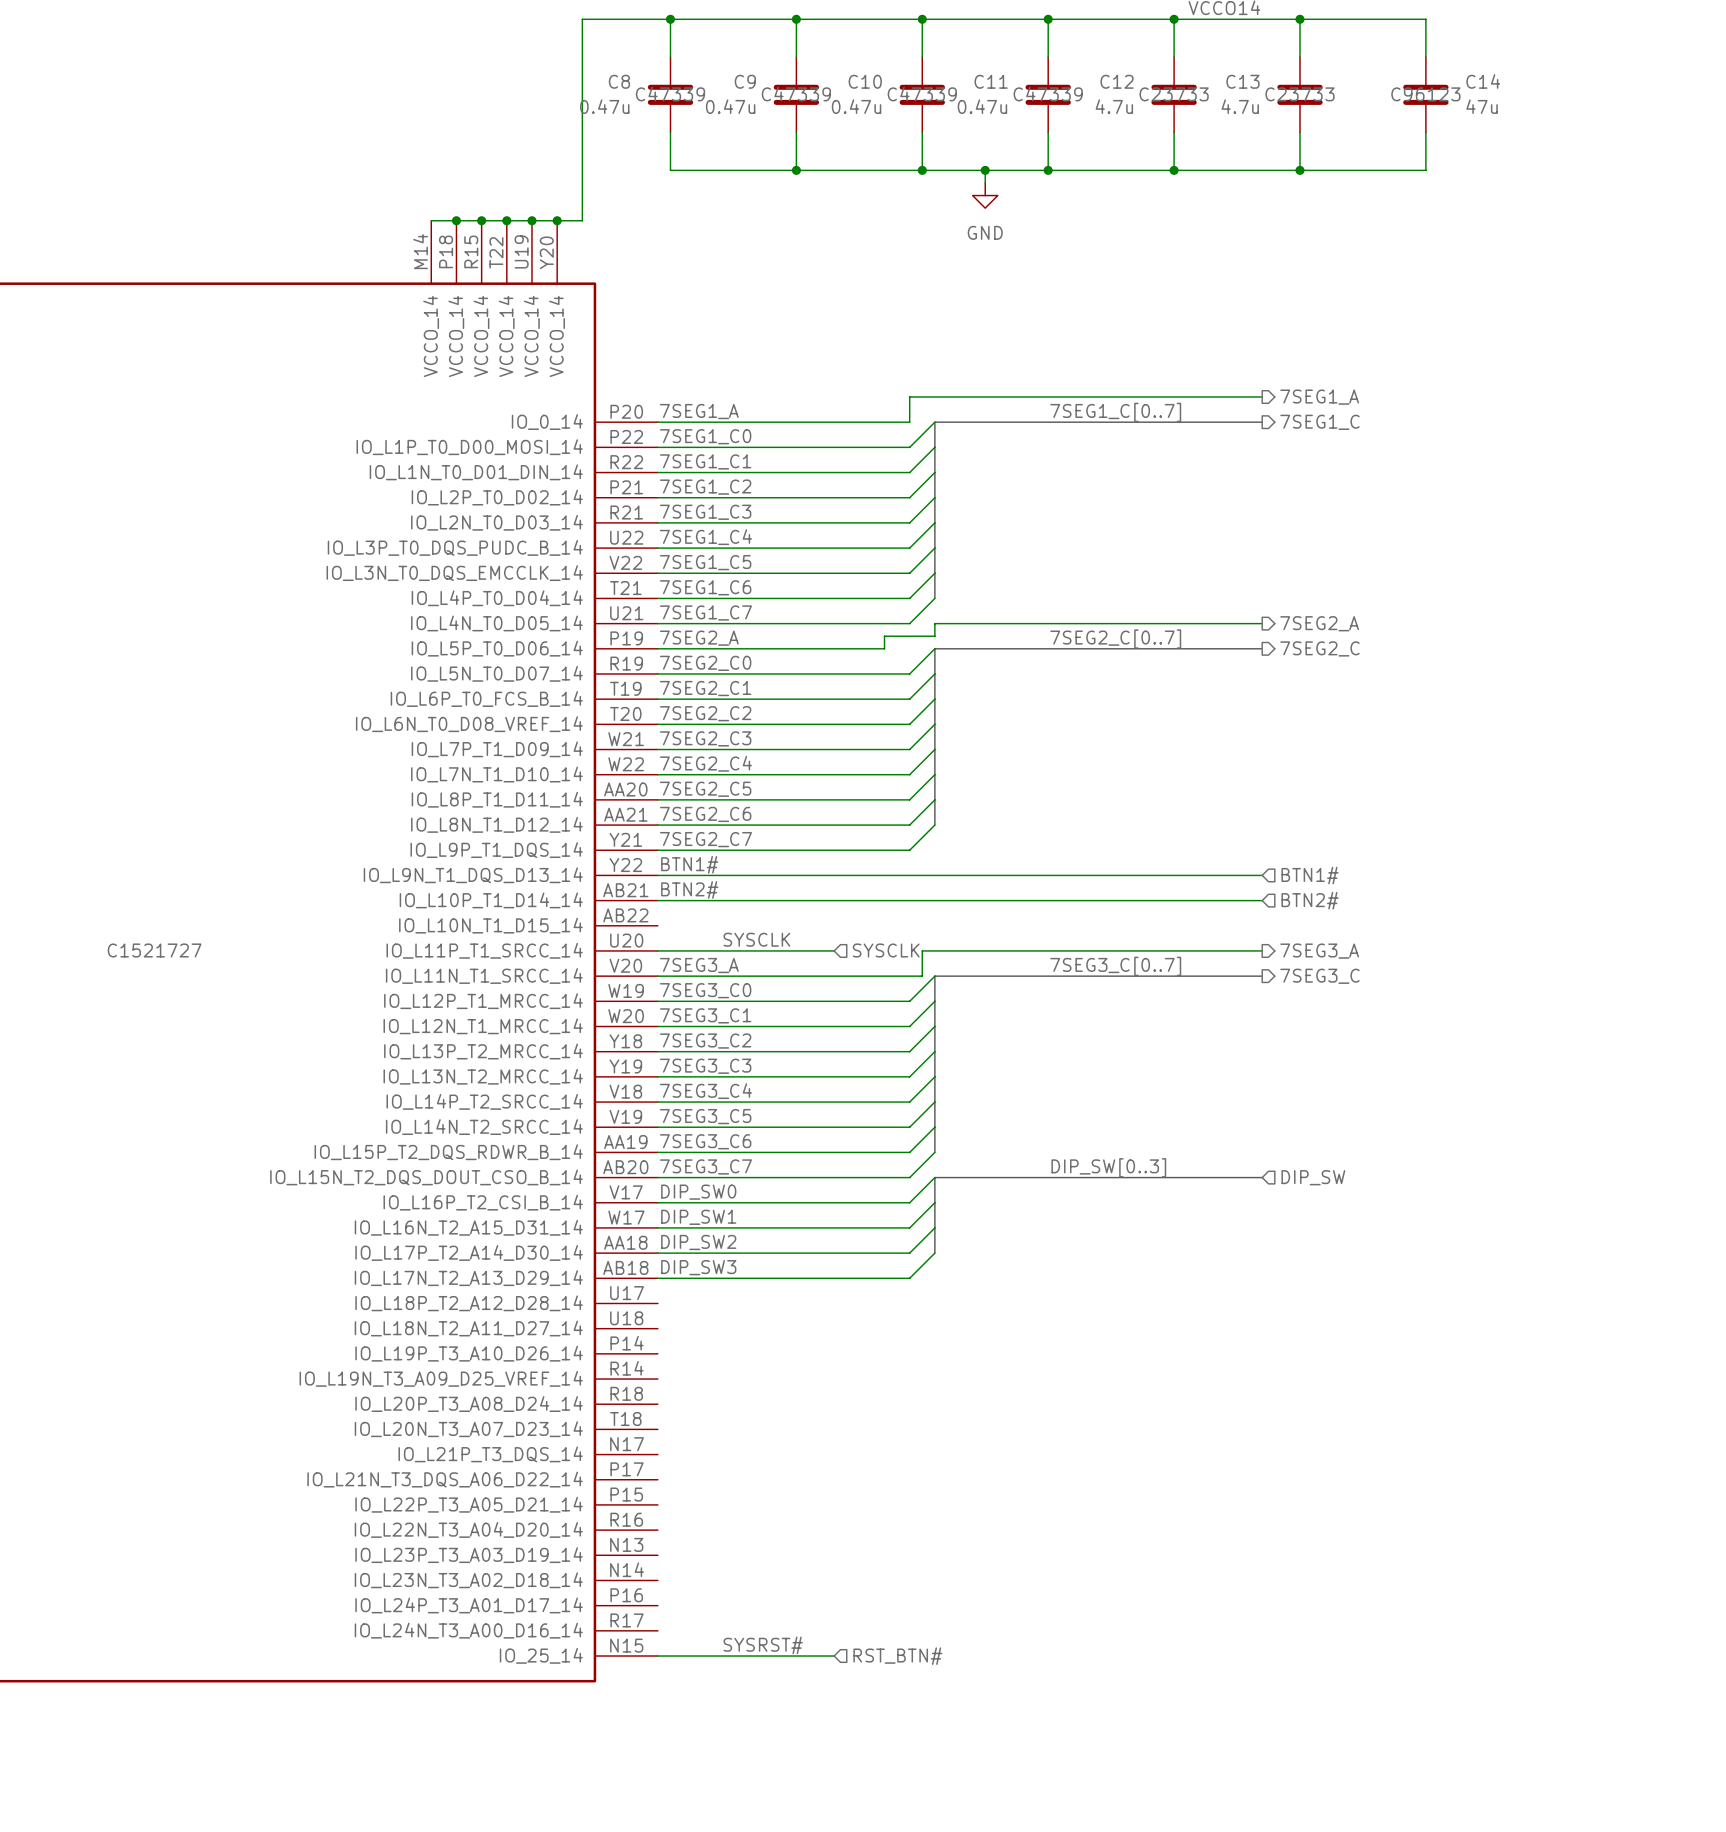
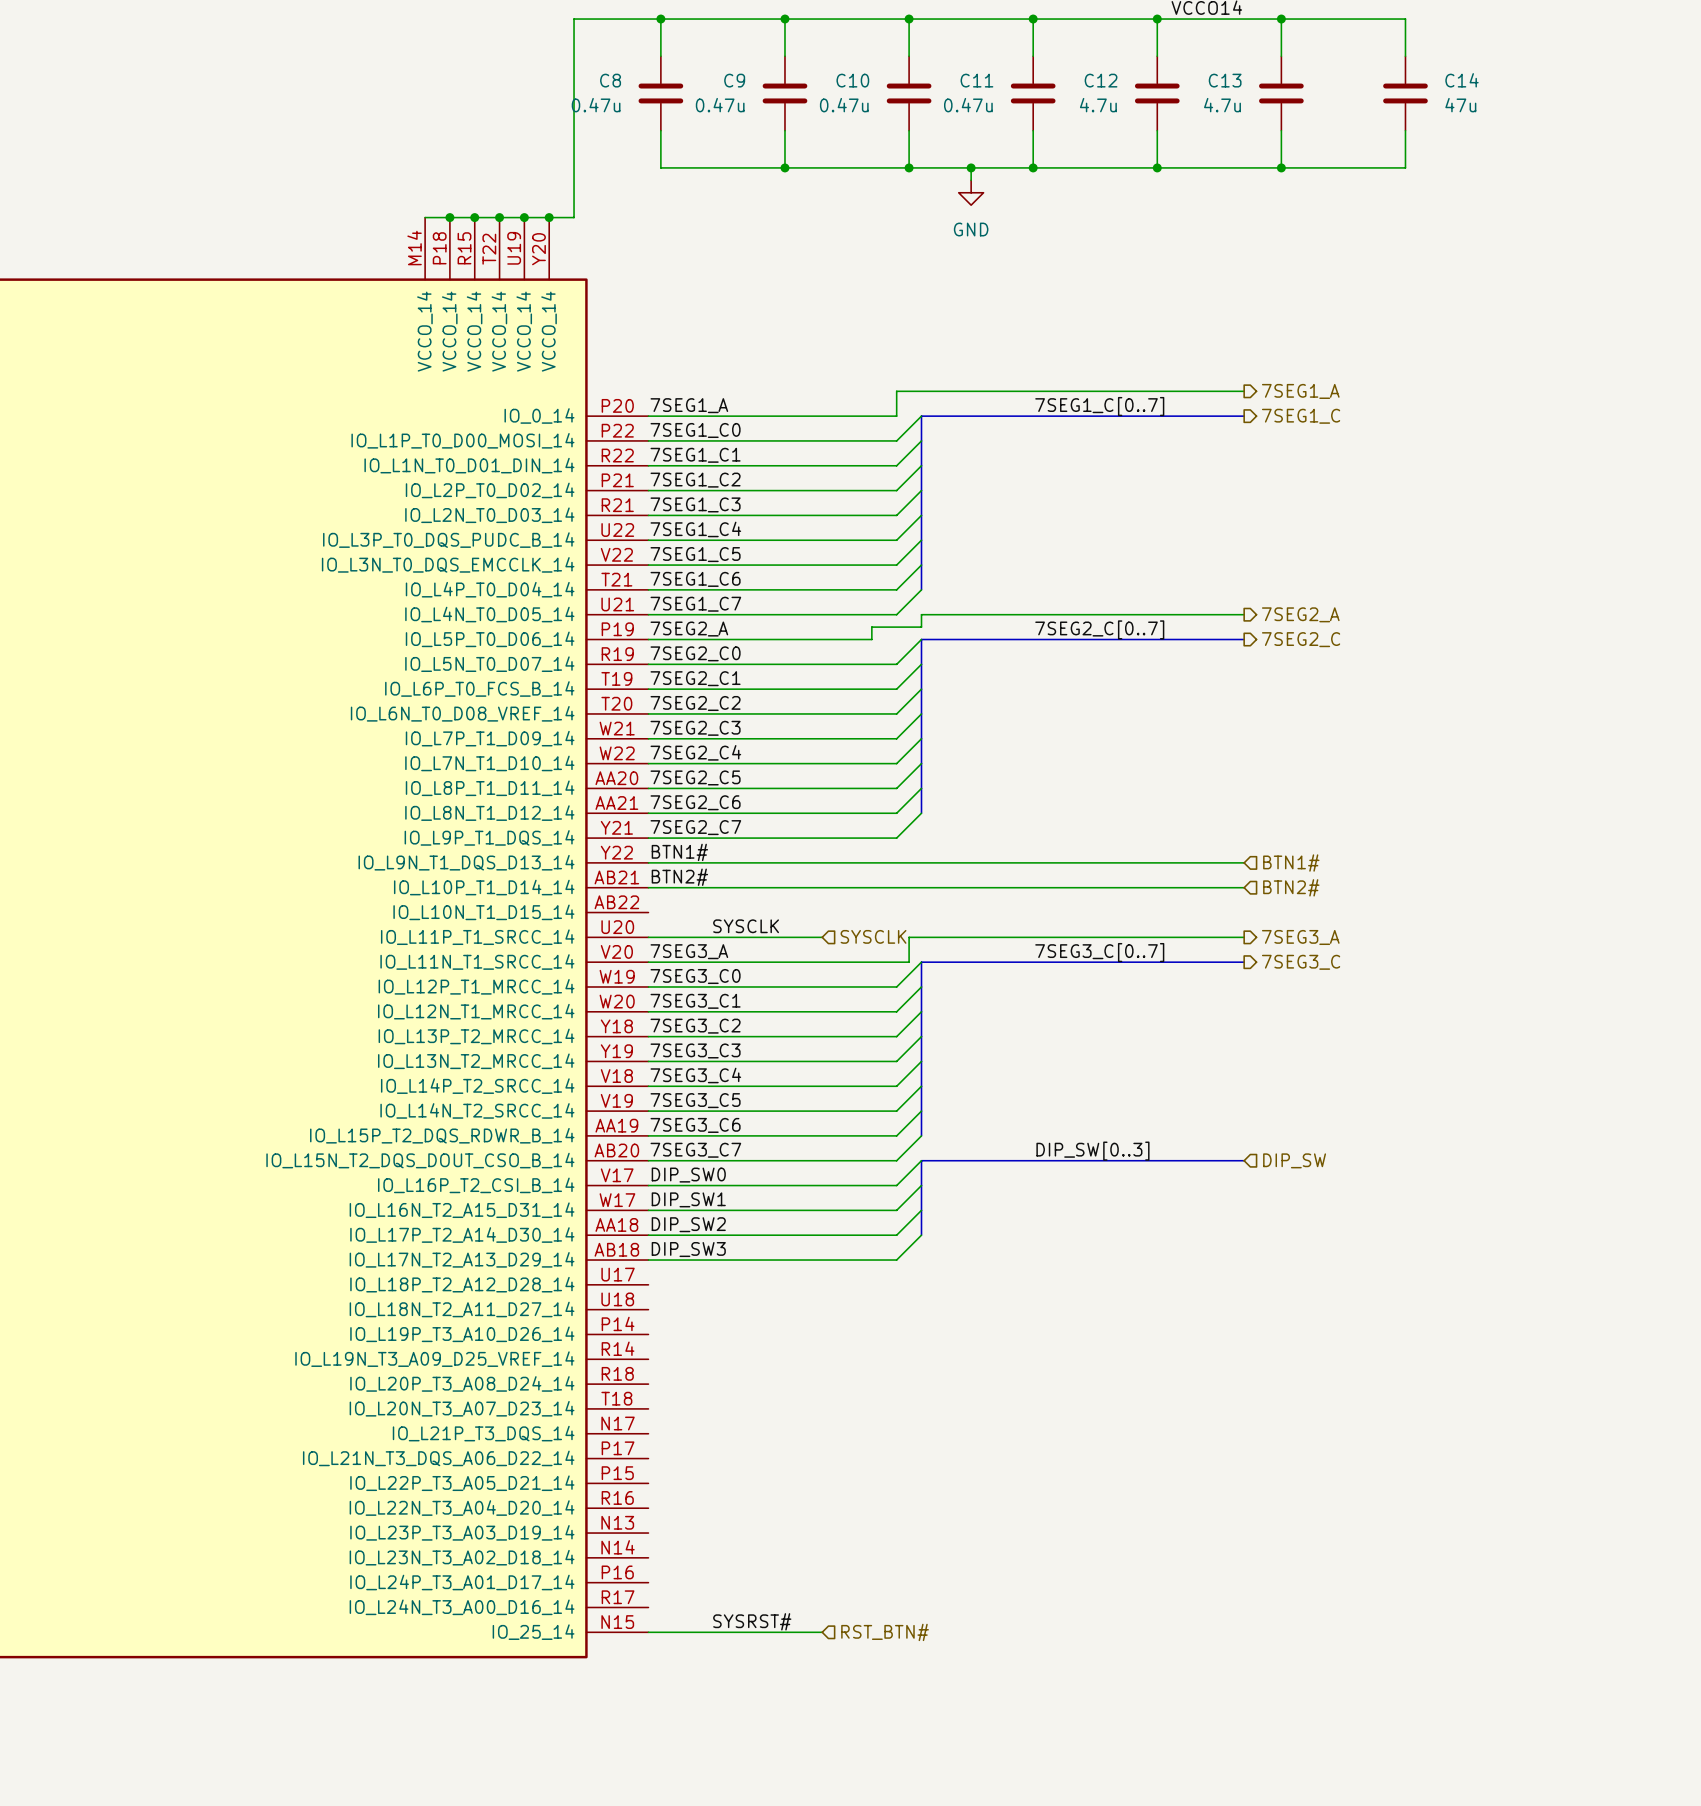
C8 text: C47339 (670, 94) -> none
C9 text: C47339 (796, 94) -> none
C10 text: C47339 (922, 94) -> none
C11 text: C47339 (1048, 94) -> none
C12 text: C23733 (1174, 94) -> none
C13 text: C23733 (1299, 94) -> none
C14 text: C96123 (1425, 94) -> none
part text: C1521727 (154, 950) -> none

